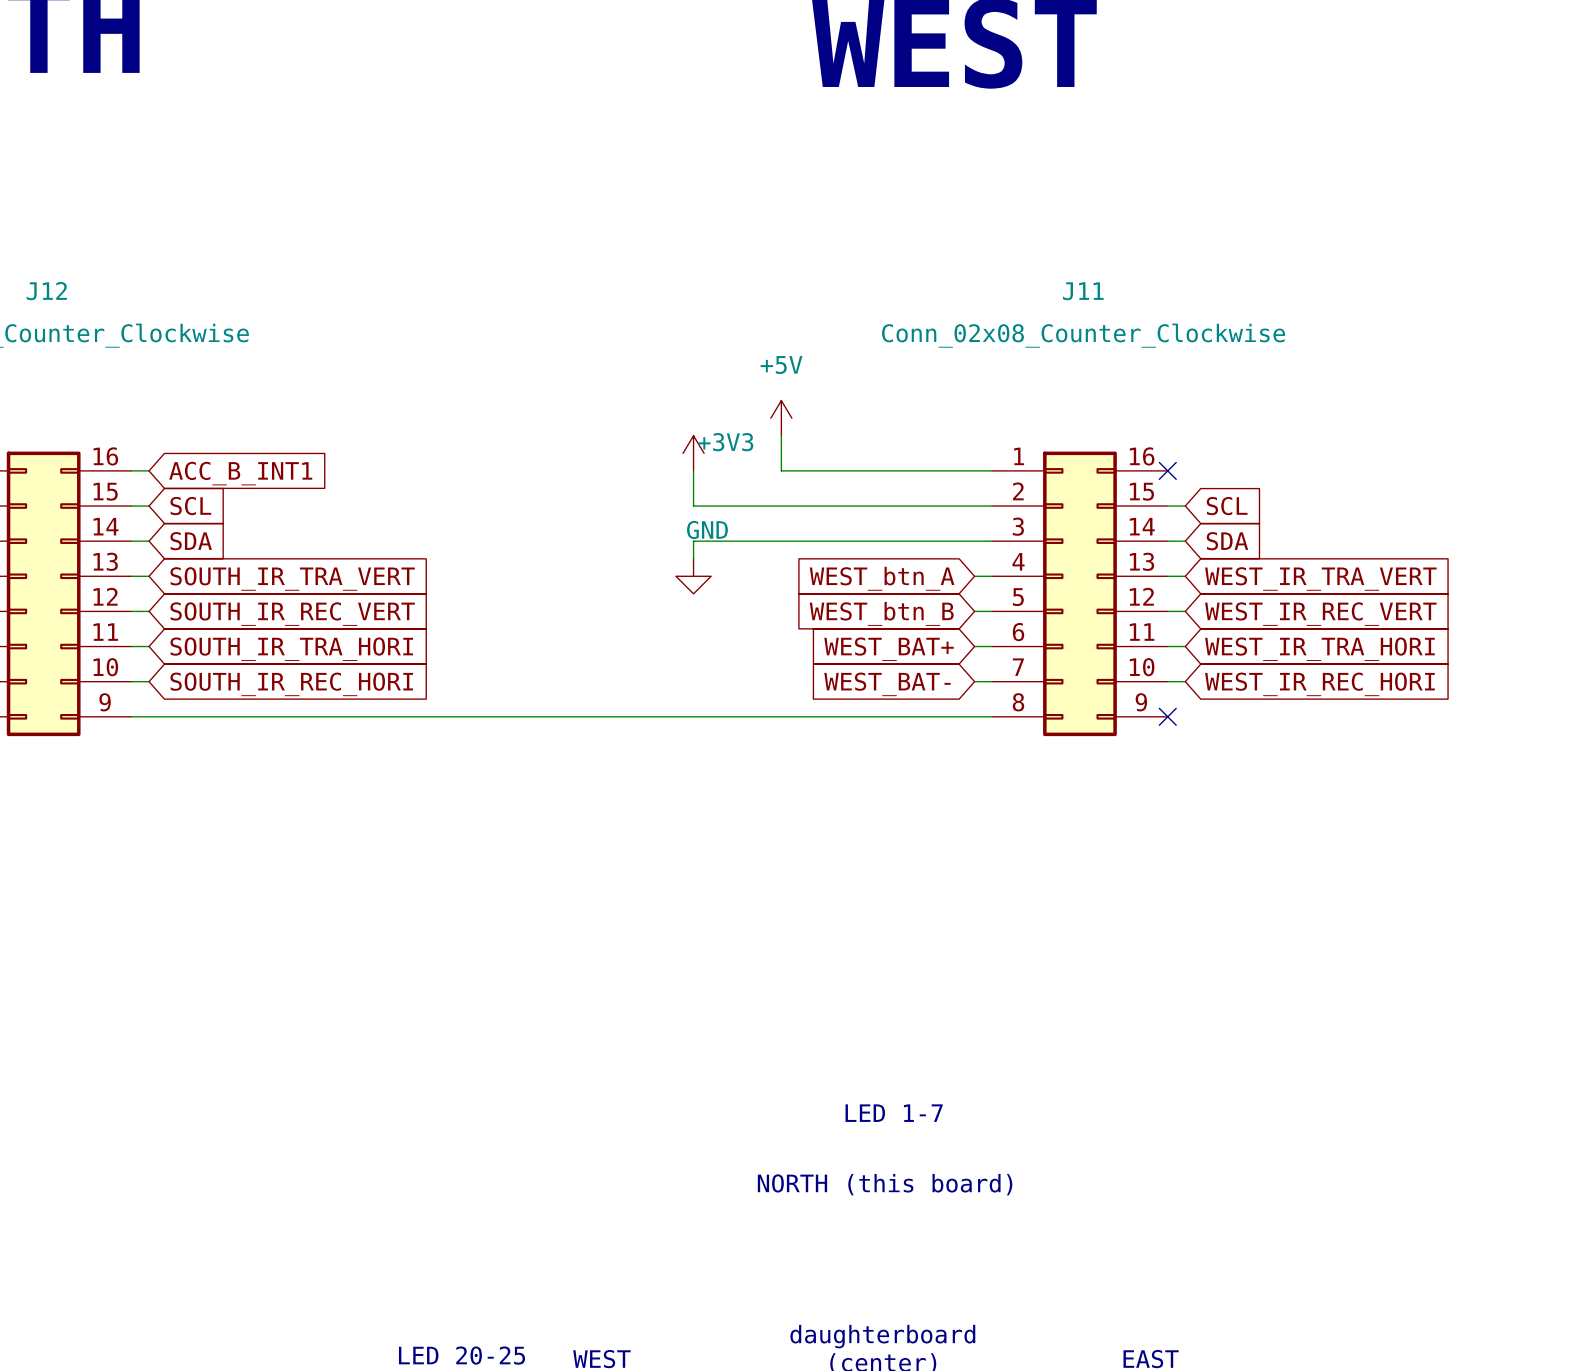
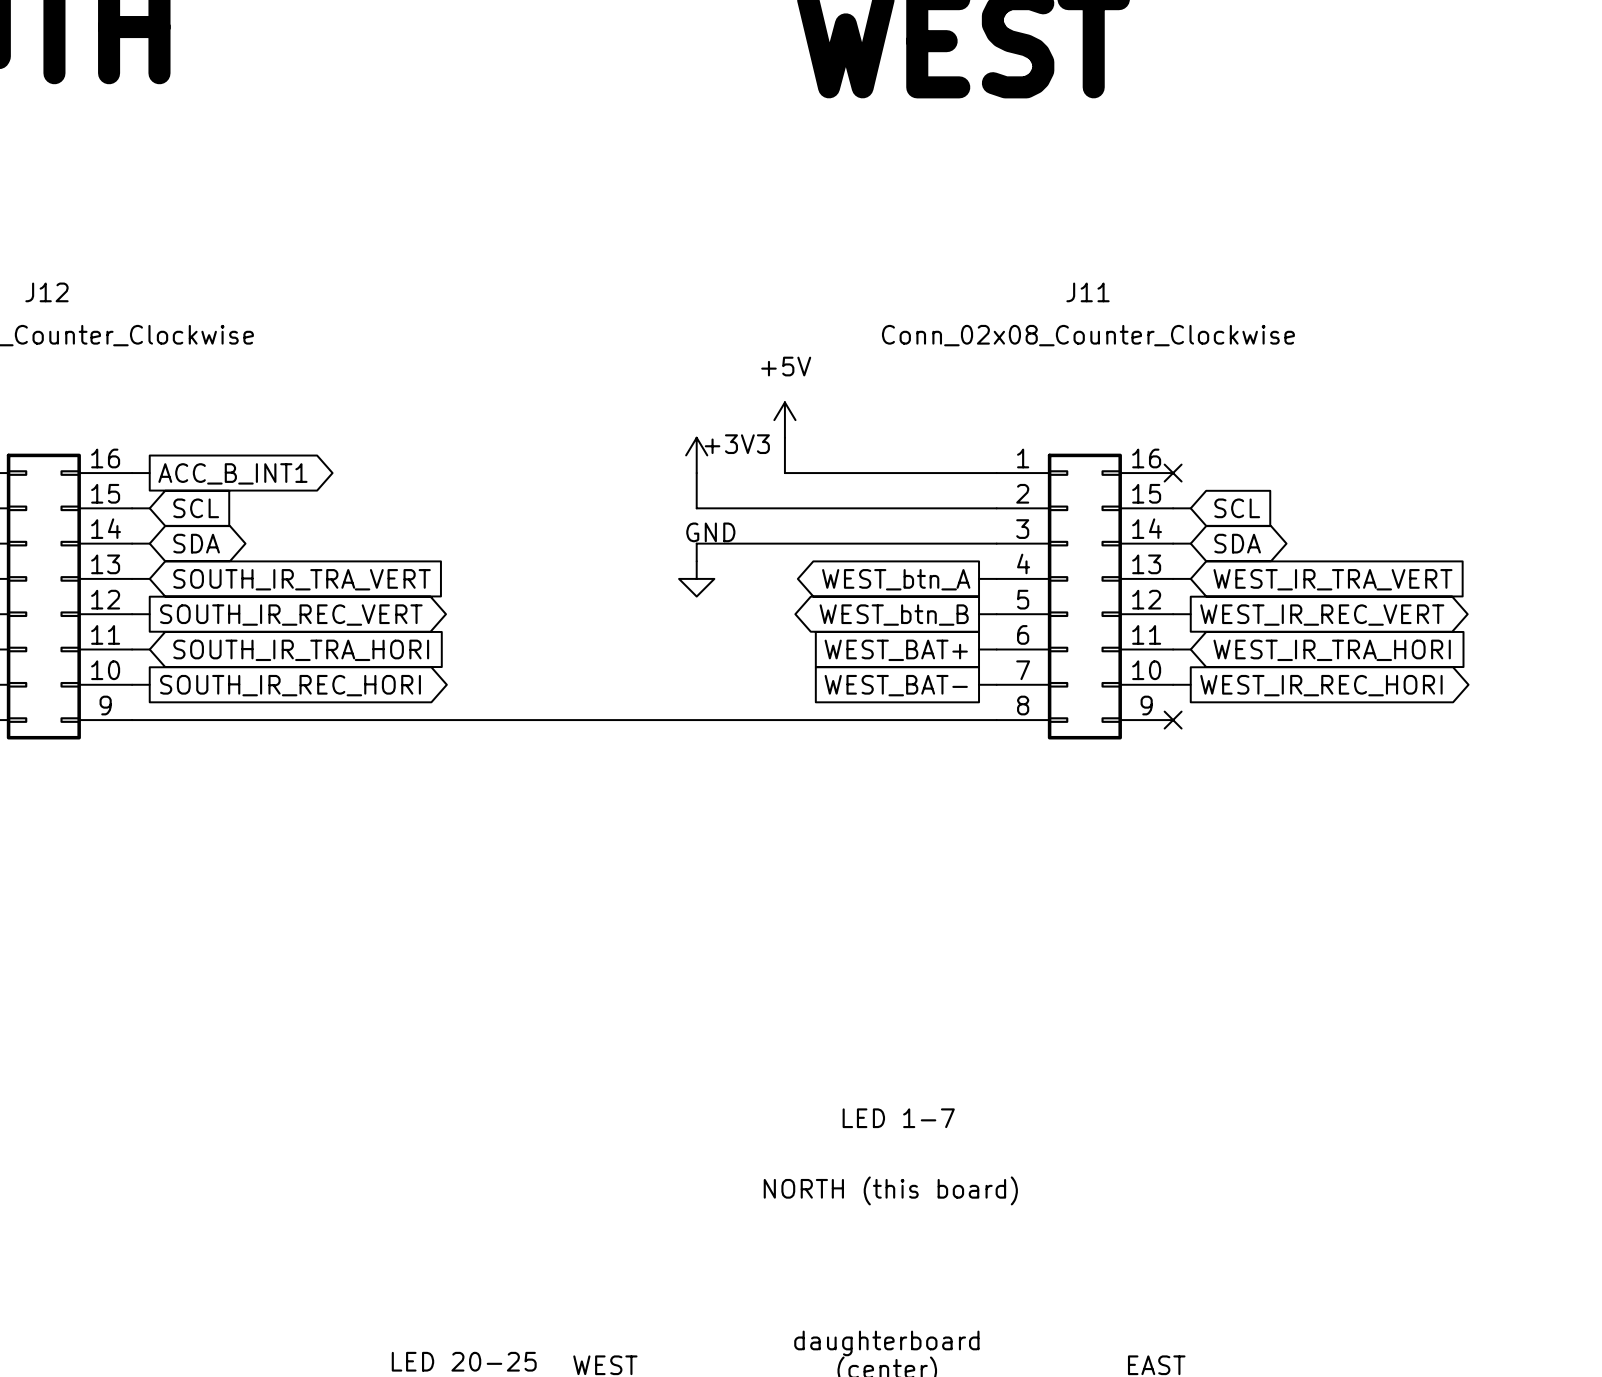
global label shape: input (240, 473) -> output (232, 473)
global label shape: input (191, 541) -> bidirectional (196, 543)
global label shape: input (1227, 541) -> bidirectional (1237, 543)
global label shape: input (882, 578) -> output (896, 579)
global label shape: input (881, 613) -> output (894, 615)
global label shape: input (292, 614) -> output (291, 615)
global label shape: input (1320, 614) -> output (1322, 615)
global label shape: input (889, 649) -> passive (896, 650)
global label shape: input (291, 684) -> output (290, 685)
global label shape: input (887, 684) -> passive (896, 685)
global label shape: input (1319, 684) -> output (1321, 685)

